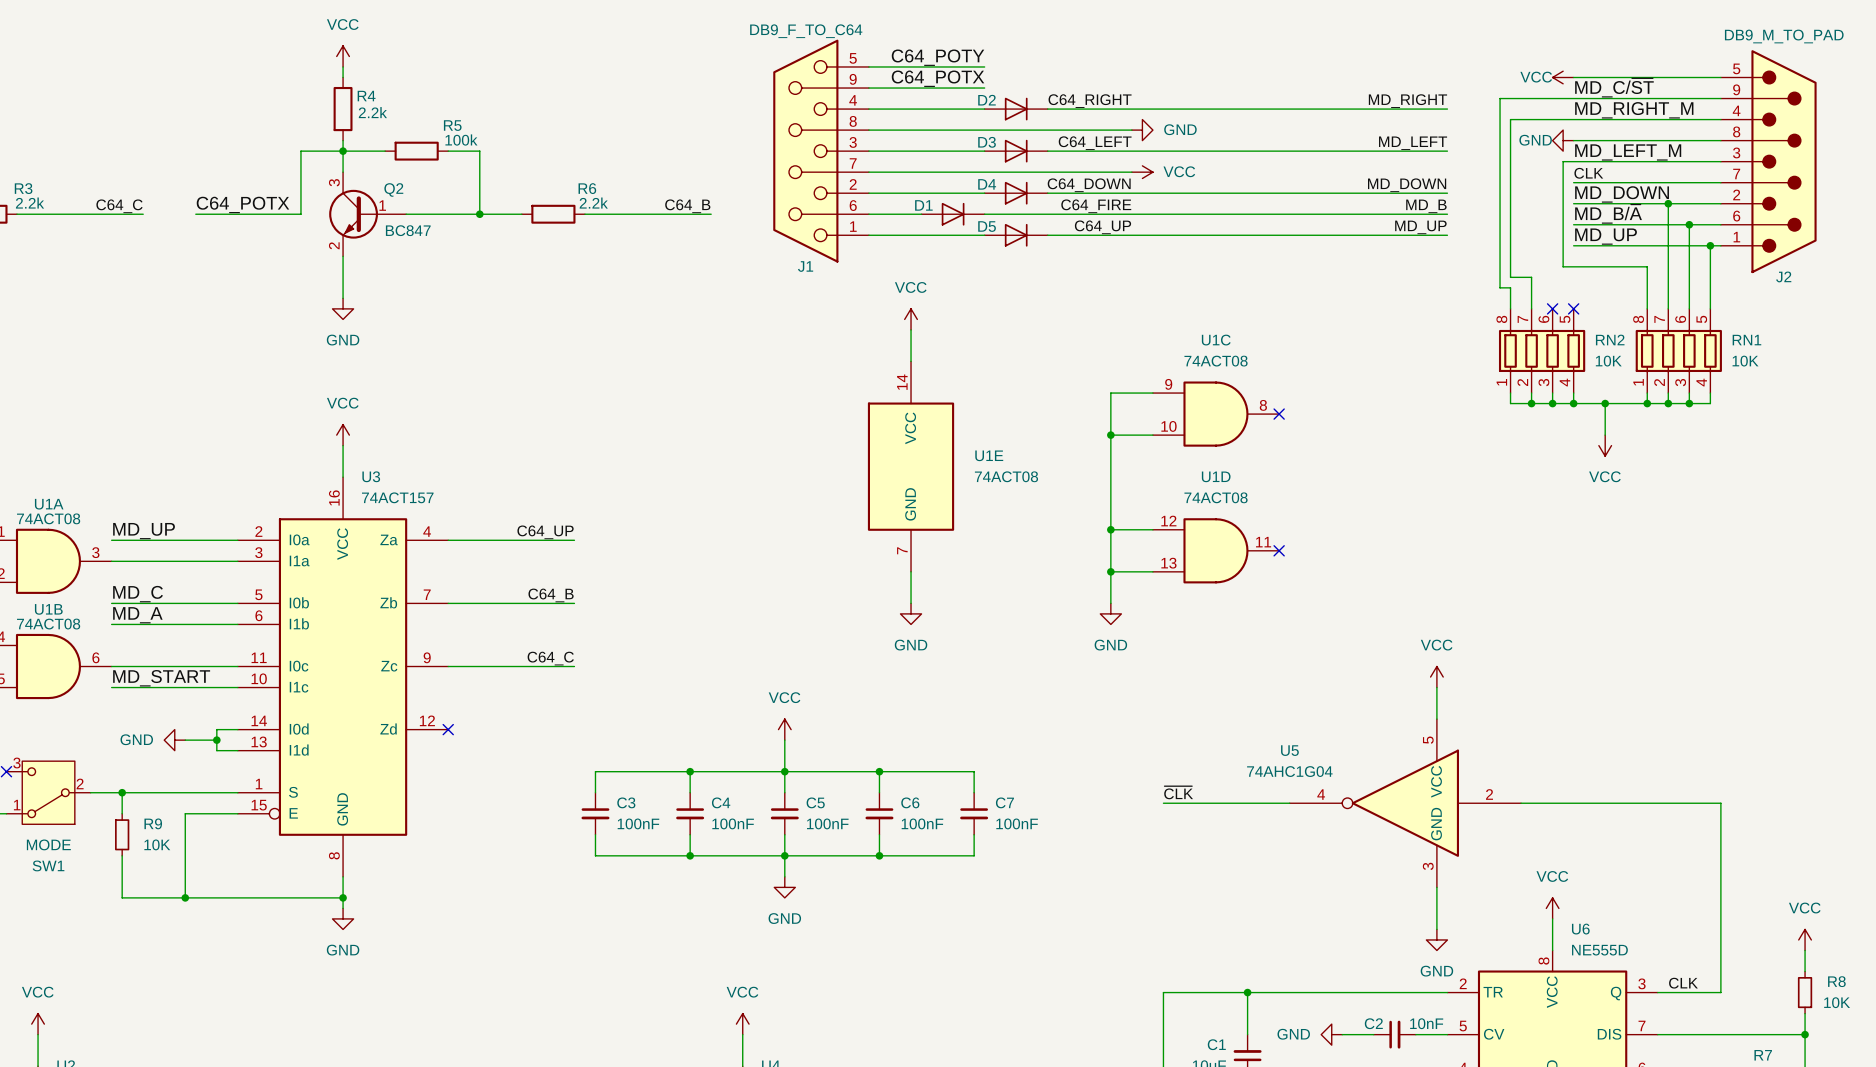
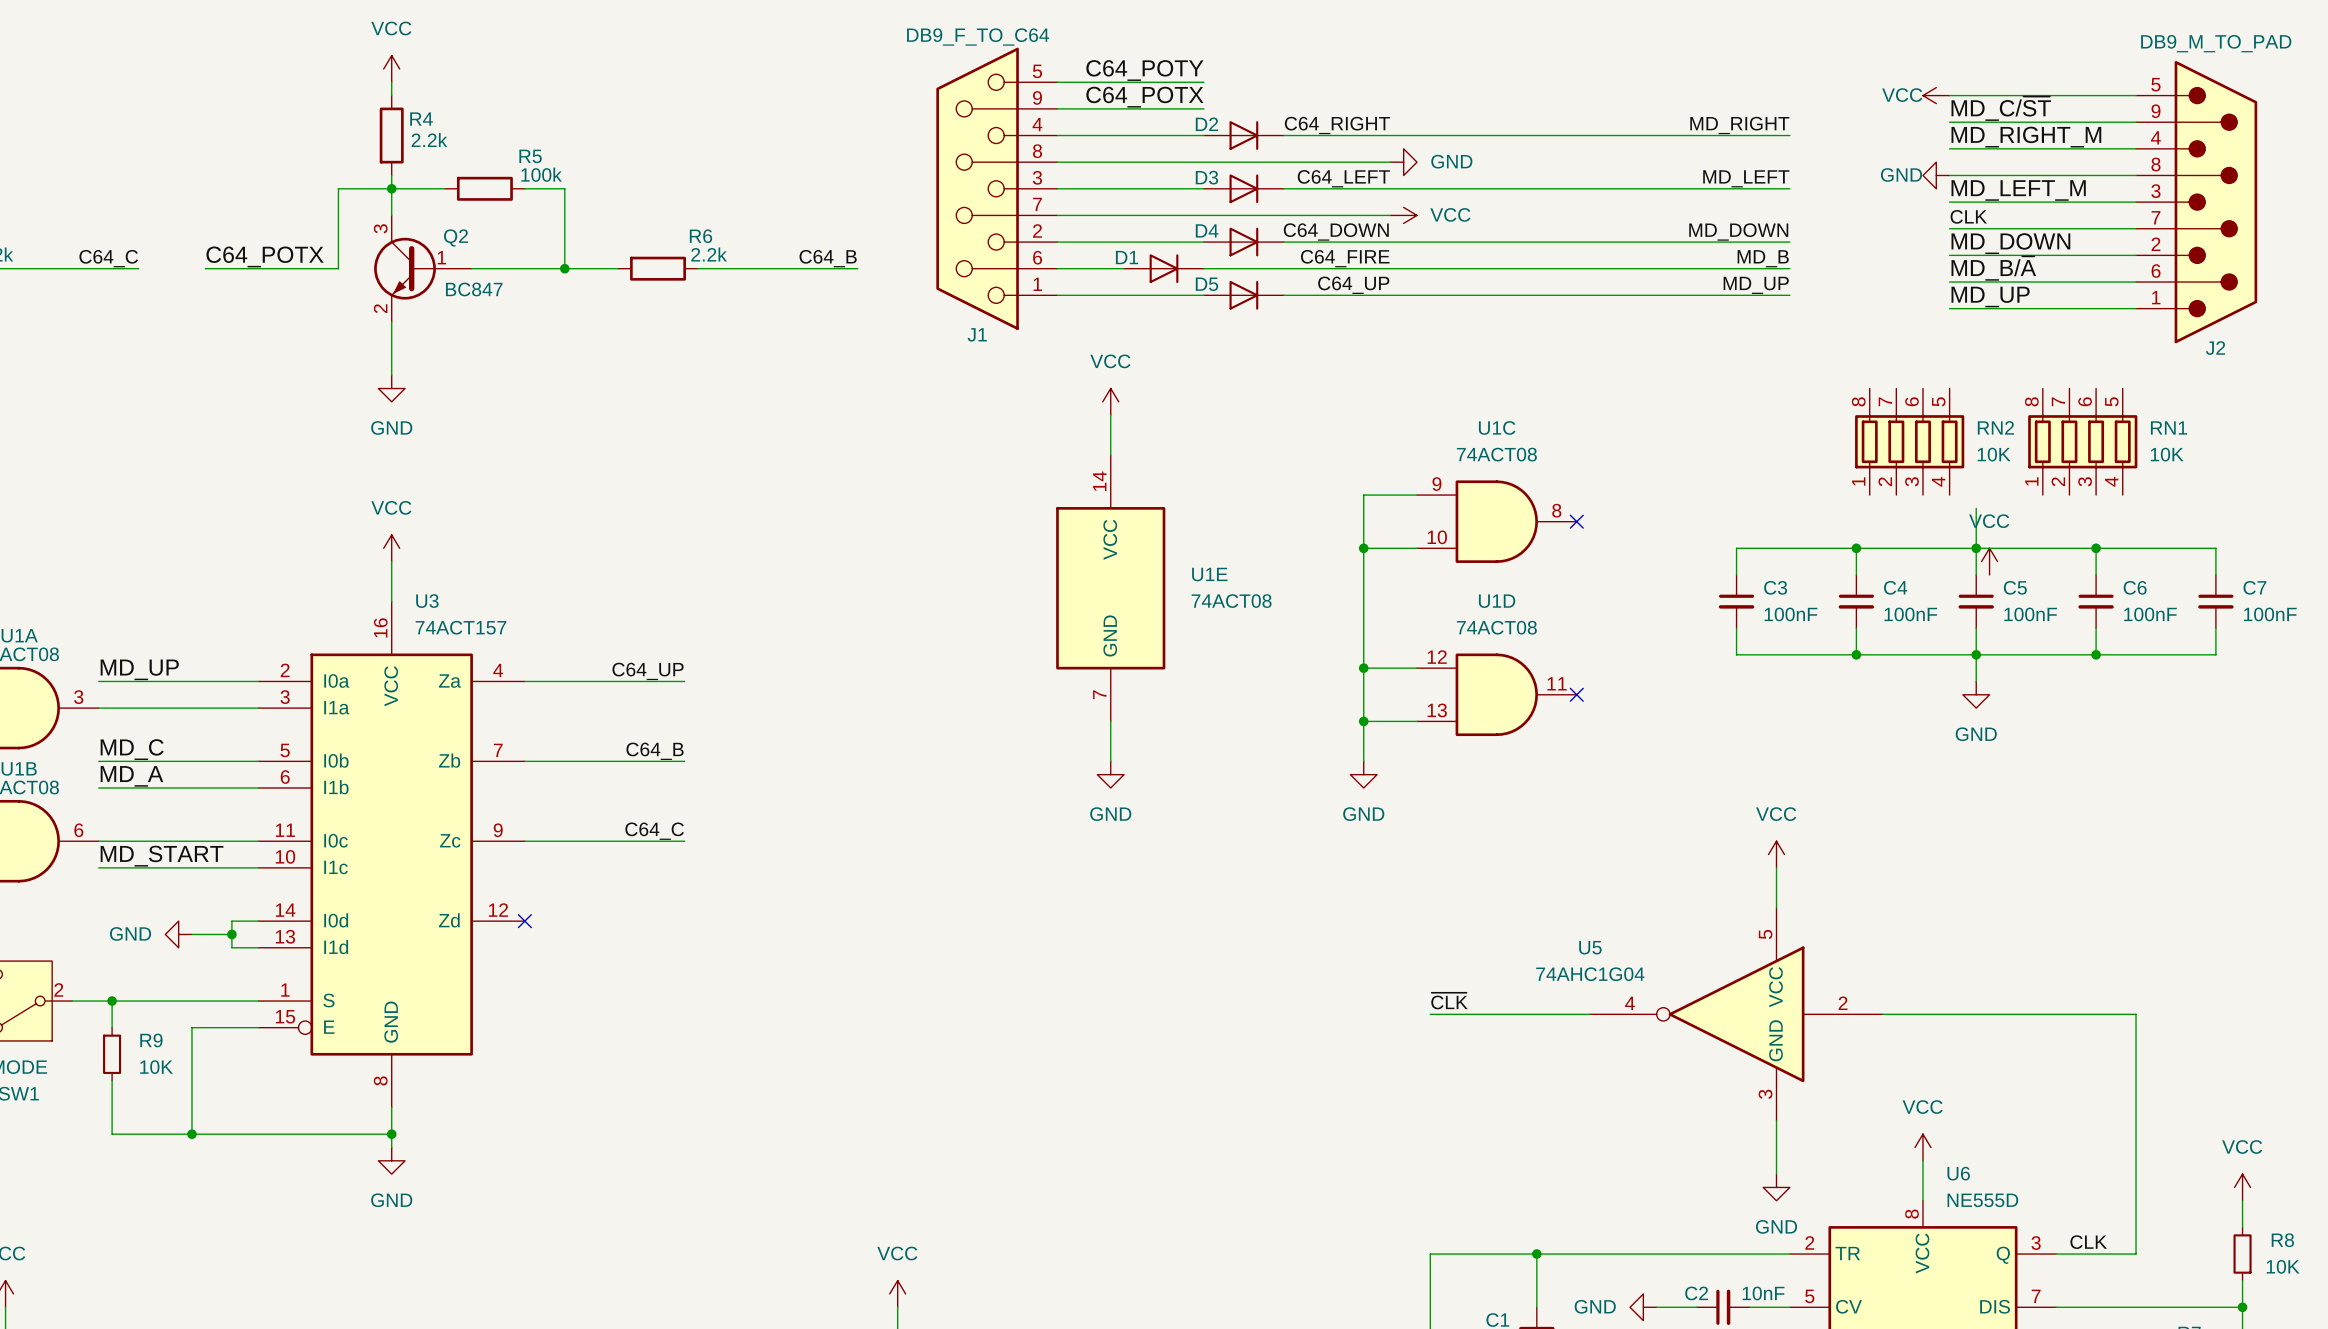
wire: (1573, 98) (1500, 98) (1500, 287) (1510, 287) (1510, 308) -> none
wire: (1573, 119) (1510, 119) (1510, 277) (1531, 277) (1531, 308) -> none
wire: (1573, 161) (1563, 161) (1563, 266) (1647, 266) (1647, 308) -> none
wire: (1668, 203) (1668, 308) -> none
junction: (1668, 203) -> none
wire: (1689, 224) (1689, 308) -> none
junction: (1689, 224) -> none
wire: (1710, 245) (1710, 308) -> none
junction: (1710, 245) -> none
no-connect mark: (1552, 308) -> none
no-connect mark: (1573, 308) -> none
wire: (1510, 393) (1510, 403) (1710, 403) (1710, 393) -> none
wire: (1531, 393) (1531, 403) -> none
wire: (1552, 393) (1552, 403) -> none
wire: (1573, 393) (1573, 403) -> none
wire: (1647, 393) (1647, 403) -> none
wire: (1668, 393) (1668, 403) -> none
wire: (1689, 393) (1689, 403) -> none
junction: (1531, 403) -> none
junction: (1552, 403) -> none
junction: (1573, 403) -> none
wire: none -> (1976, 508) (1976, 574)
wire: (1605, 403) (1605, 435) -> none
junction: (1605, 403) -> none
junction: (1647, 403) -> none
junction: (1668, 403) -> none
junction: (1689, 403) -> none
wire: none -> (1856, 548) (1856, 574)
junction: none -> (1856, 548)
junction: none -> (1976, 548)
wire: none -> (2096, 548) (2096, 574)
junction: none -> (2096, 548)
power symbol rotation: 0° (1605, 445) -> 180° (1989, 561)
wire: none -> (1736, 574) (1736, 548) (2215, 548) (2215, 574)
wire: none -> (1736, 628) (1736, 654) (2215, 654) (2215, 628)
wire: none -> (1856, 628) (1856, 654)
wire: none -> (1976, 628) (1976, 681)
wire: none -> (2096, 628) (2096, 654)
junction: none -> (1856, 654)
junction: none -> (1976, 654)
junction: none -> (2096, 654)
power symbol: none -> GND (1976, 694)
power symbol: VCC (784, 729) -> none
wire: (784, 740) (784, 792) -> none
wire: (690, 771) (690, 792) -> none
junction: (690, 771) -> none
junction: (784, 771) -> none
wire: (879, 771) (879, 792) -> none
junction: (879, 771) -> none
wire: (595, 792) (595, 771) (974, 771) (974, 792) -> none
C3 position: (595, 813) -> (1736, 601)
C4 position: (690, 813) -> (1856, 601)
C5 position: (784, 813) -> (1976, 601)
C6 position: (879, 813) -> (2096, 601)
C7 position: (974, 813) -> (2215, 601)
wire: (595, 834) (595, 855) (974, 855) (974, 834) -> none
wire: (690, 834) (690, 855) -> none
wire: (784, 834) (784, 876) -> none
wire: (879, 834) (879, 855) -> none
junction: (690, 855) -> none
junction: (784, 855) -> none
junction: (879, 855) -> none
power symbol: GND (784, 887) -> none

